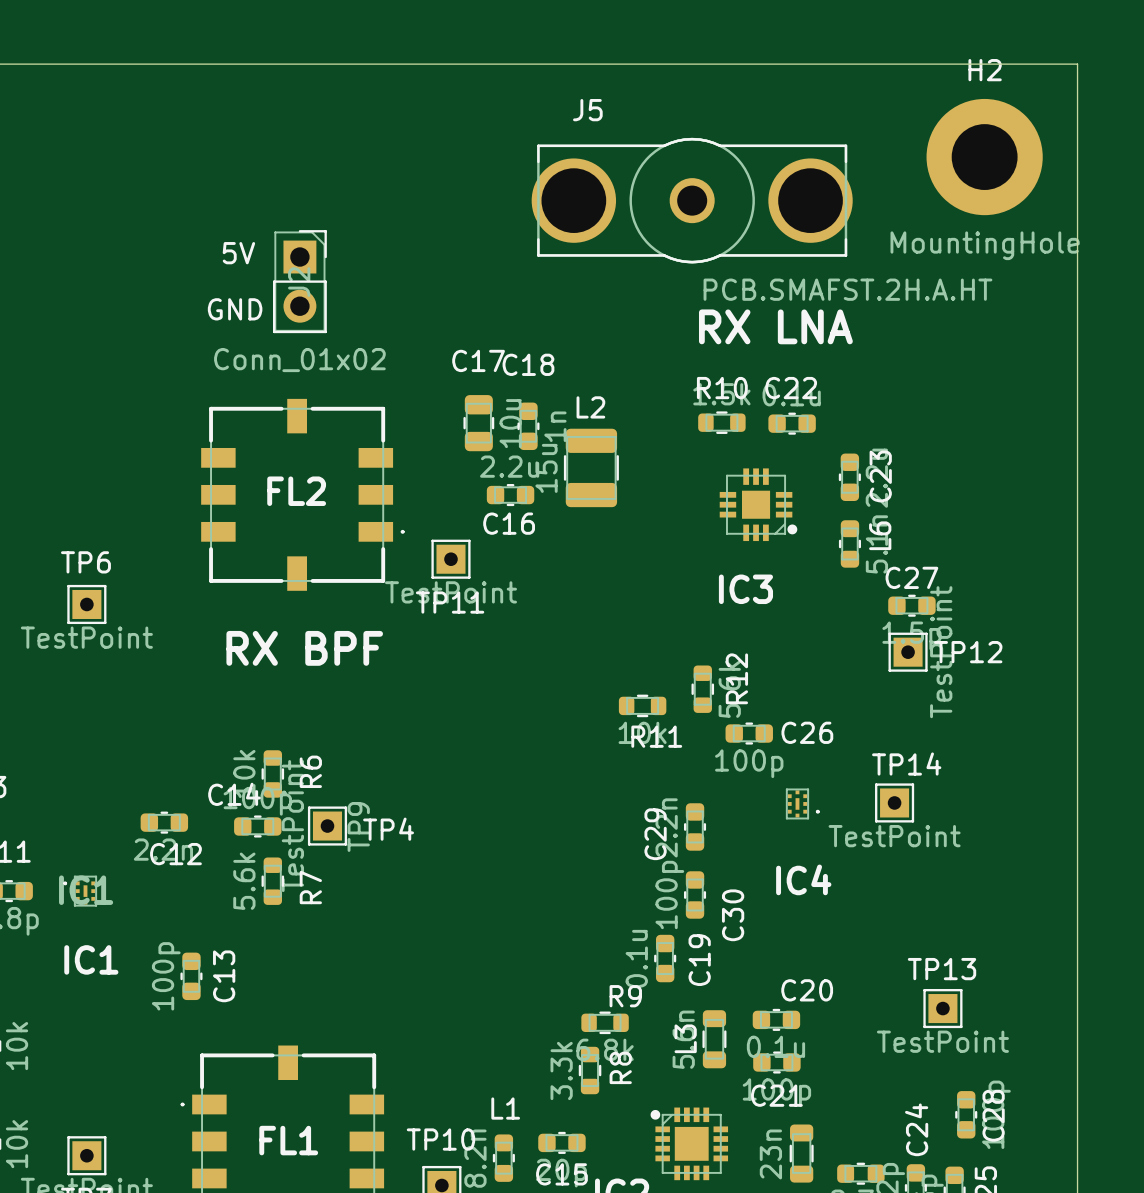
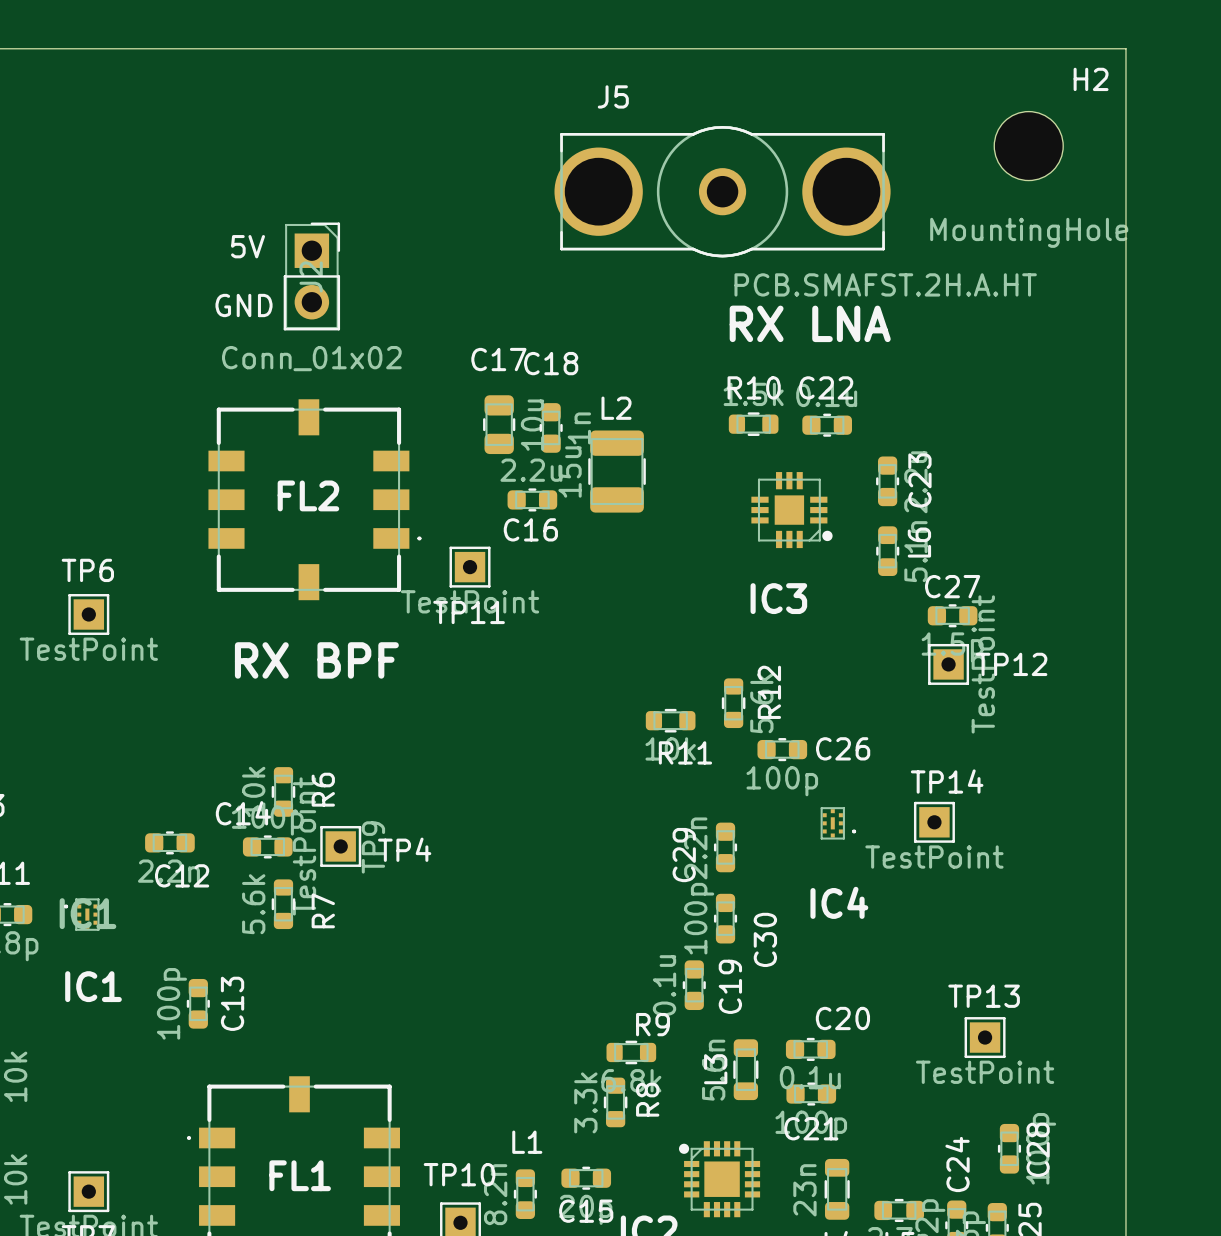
H2 name position: H2 (985, 70) -> H2 (1091, 79)
H2 footprint: [926, 98, 1043, 216] -> [994, 111, 1064, 181]

